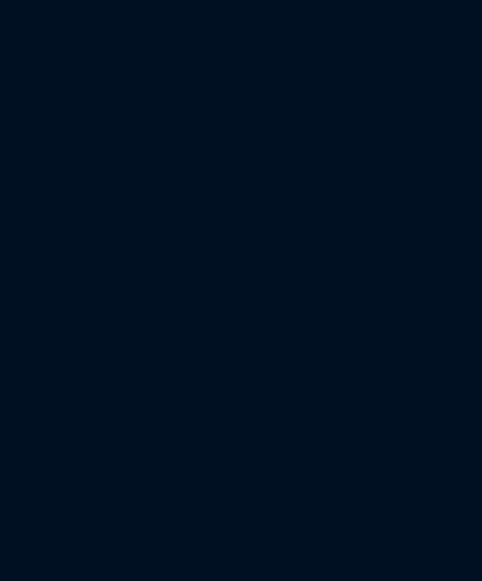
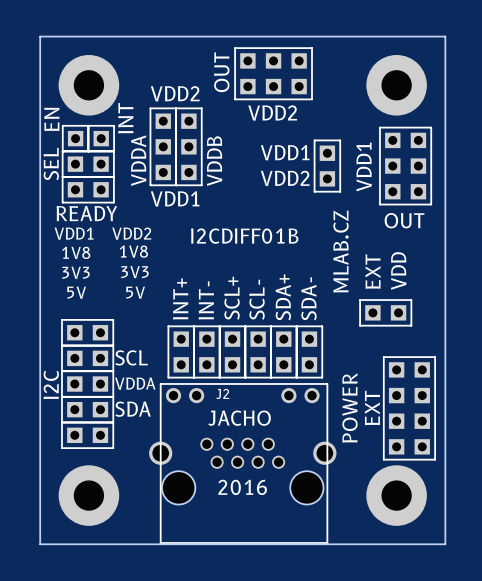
board edge: none -> (40, 36) (40, 544) (445, 544) (445, 36) (40, 36)
text: none -> OUT (221, 72)
part: none -> (273, 73)
part: none -> (88, 85)
part: none -> (396, 85)
text: none -> VDD2 (175, 93)
text: none -> VDD2 (272, 113)
text: none -> INT (125, 118)
text: none -> EN (51, 119)
part: none -> (75, 138)
part: none -> (101, 138)
part: none -> (163, 146)
part: none -> (188, 146)
text: none -> VDD1 (285, 152)
text: none -> VDDA (138, 160)
text: none -> VDDB (214, 161)
text: none -> SEL (51, 164)
part: none -> (88, 164)
part: none -> (327, 166)
text: none -> VDD1 (364, 166)
part: none -> (405, 166)
text: none -> VDD2 (285, 178)
part: none -> (88, 189)
text: none -> VDD1 (175, 198)
text: none -> READY (86, 213)
text: none -> OUT (404, 220)
text: none -> VDD1 (74, 233)
text: none -> VDD2 (131, 233)
text: none -> I2CDIFF01B (244, 236)
text: none -> 1V8 (133, 251)
text: none -> MLAB.CZ (341, 251)
text: none -> 1V8 (76, 252)
text: none -> EXT (372, 271)
text: none -> VDD (398, 270)
text: none -> 3V3 (75, 272)
text: none -> 3V3 (134, 272)
text: none -> 5V (76, 292)
text: none -> 5V (135, 292)
text: none -> INT+ (180, 298)
text: none -> SCL+ (232, 298)
text: none -> INT- (206, 300)
text: none -> SCL- (257, 299)
text: none -> SDA+ (283, 297)
text: none -> SDA- (308, 298)
part: none -> (385, 312)
part: none -> (87, 332)
part: none -> (181, 351)
part: none -> (206, 351)
part: none -> (232, 351)
part: none -> (258, 351)
part: none -> (283, 351)
part: none -> (309, 351)
text: none -> SCL (131, 357)
part: none -> (87, 358)
text: none -> VDDA (135, 383)
part: none -> (87, 384)
text: none -> I2C (51, 384)
text: none -> POWER (349, 407)
text: none -> EXT (372, 408)
part: none -> (409, 408)
part: none -> (87, 409)
text: none -> SDA (133, 409)
text: none -> JACHO (239, 418)
part: none -> (87, 435)
J2: none -> (242, 463)
text: none -> 2016 (242, 487)
part: none -> (88, 495)
part: none -> (396, 495)

